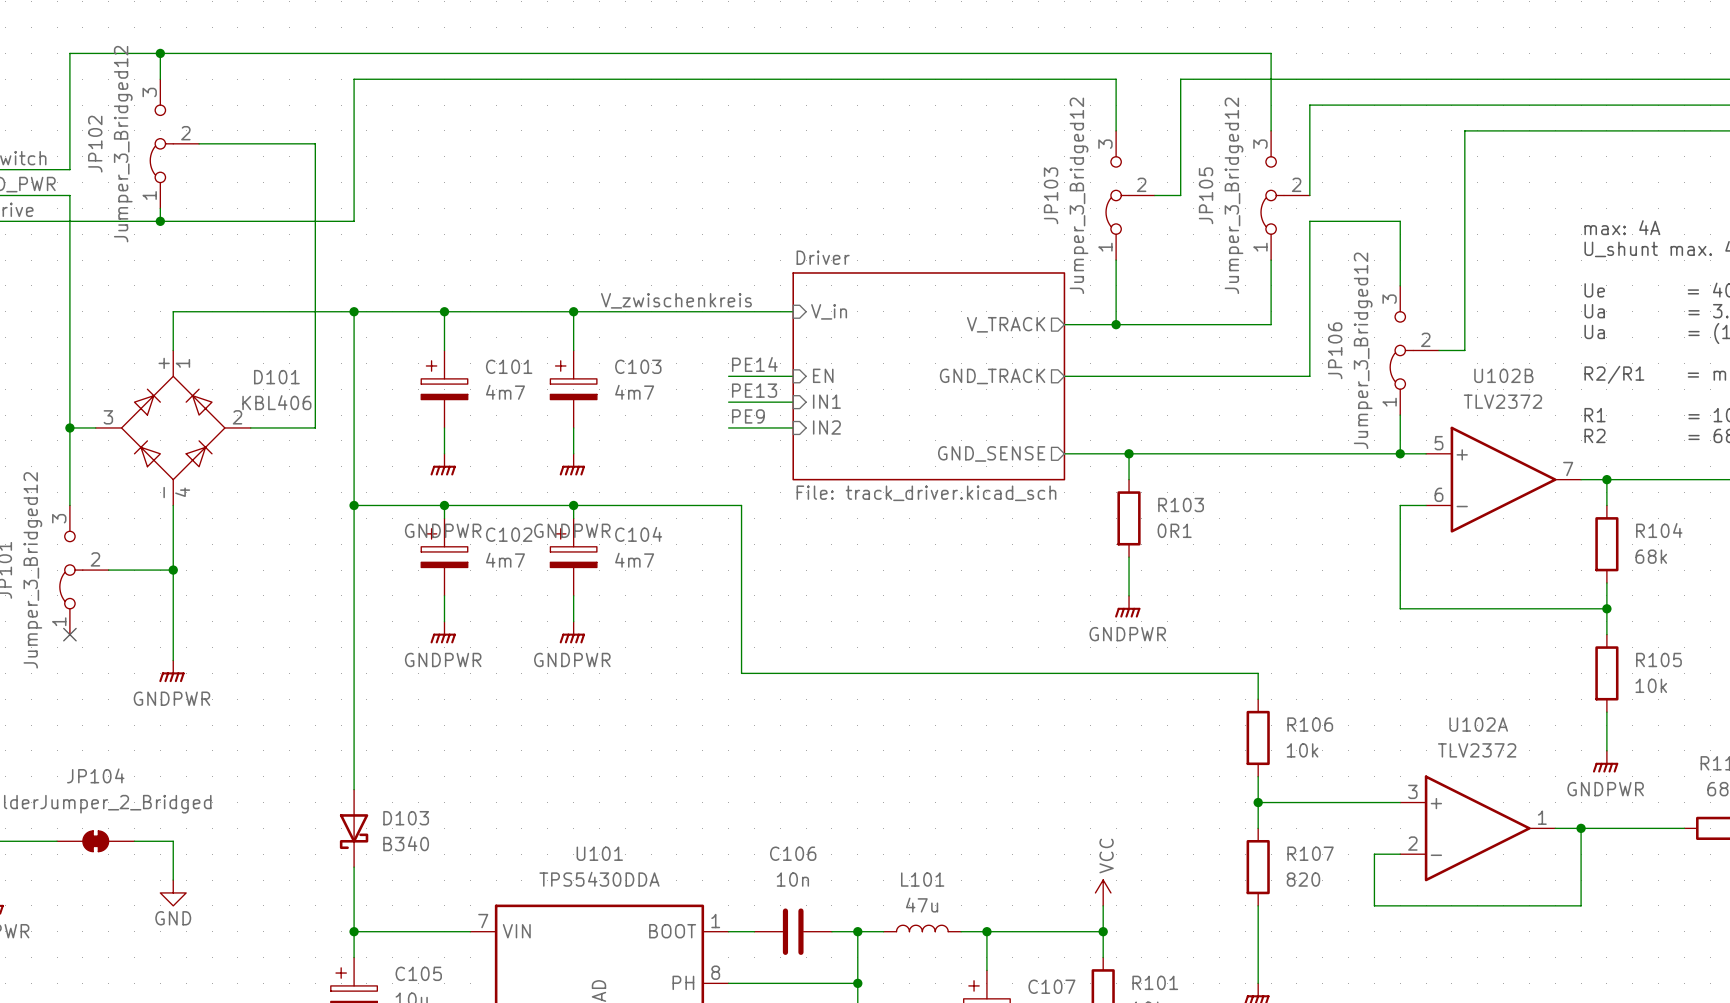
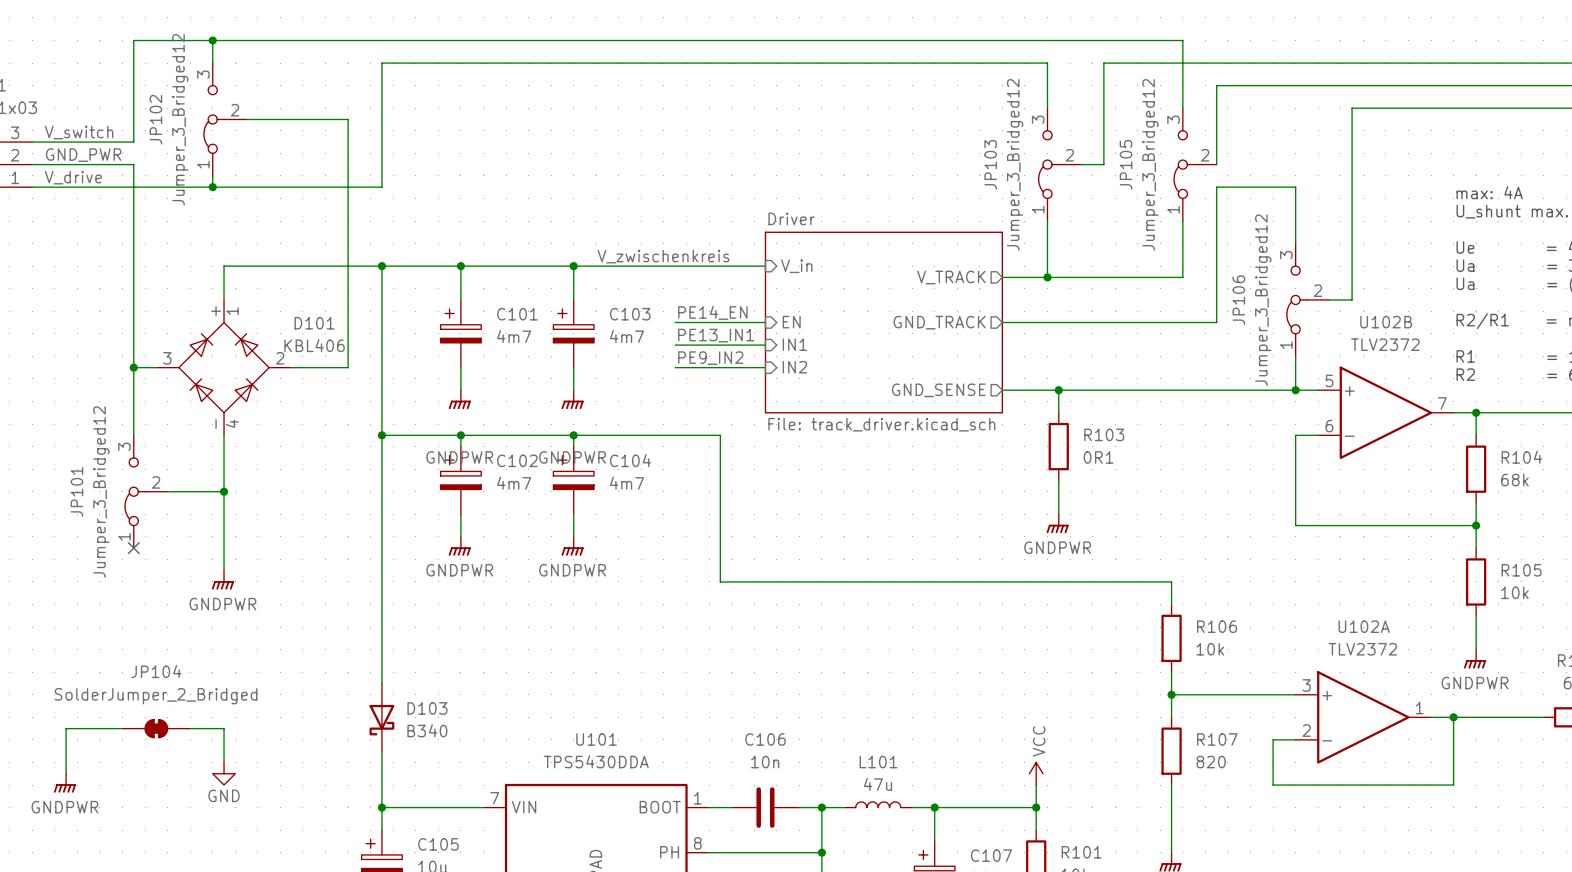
label: PE14 (754, 364) -> PE14_EN (712, 312)
wire: none -> (675, 322) (709, 322)
label: PE13 (754, 390) -> PE13_IN1 (716, 335)
wire: none -> (675, 345) (709, 345)
label: PE9 (748, 416) -> none
label: none -> PE9_IN2 (710, 358)
wire: none -> (675, 367) (709, 367)

